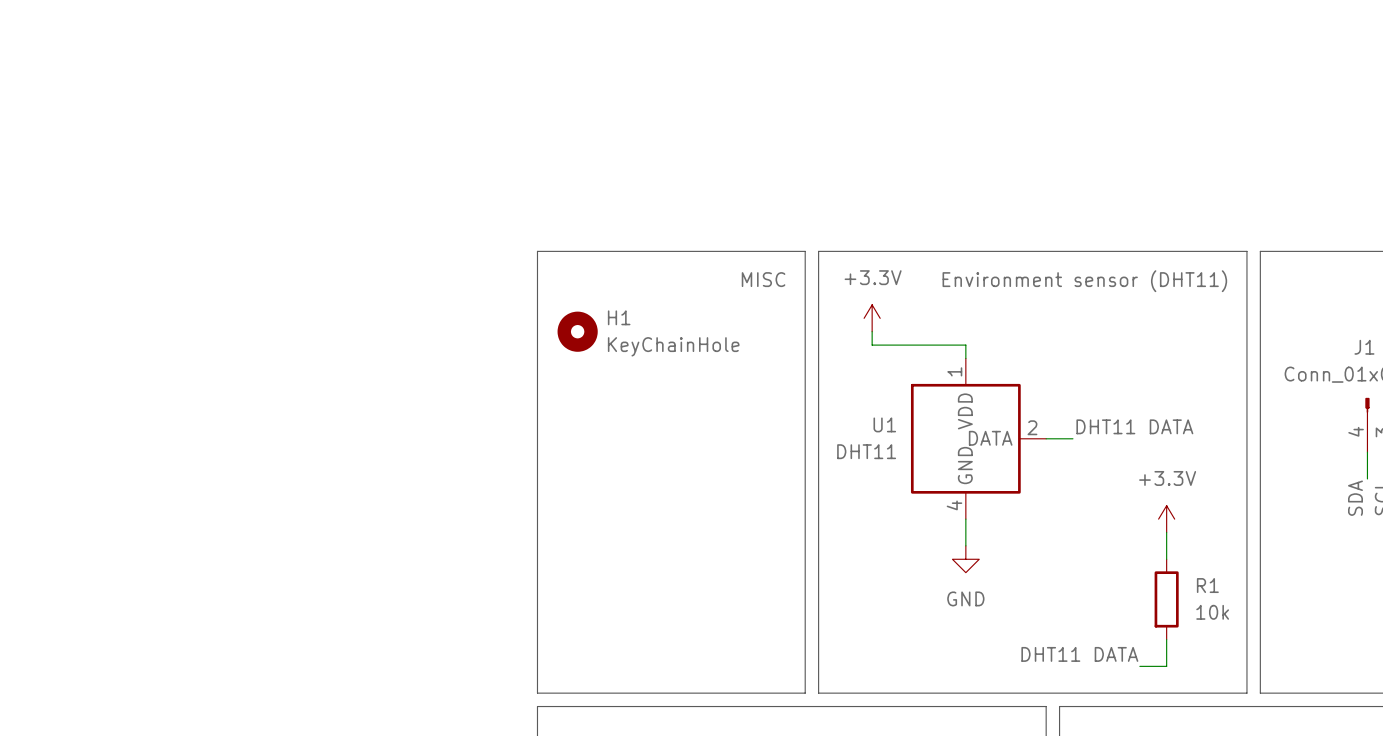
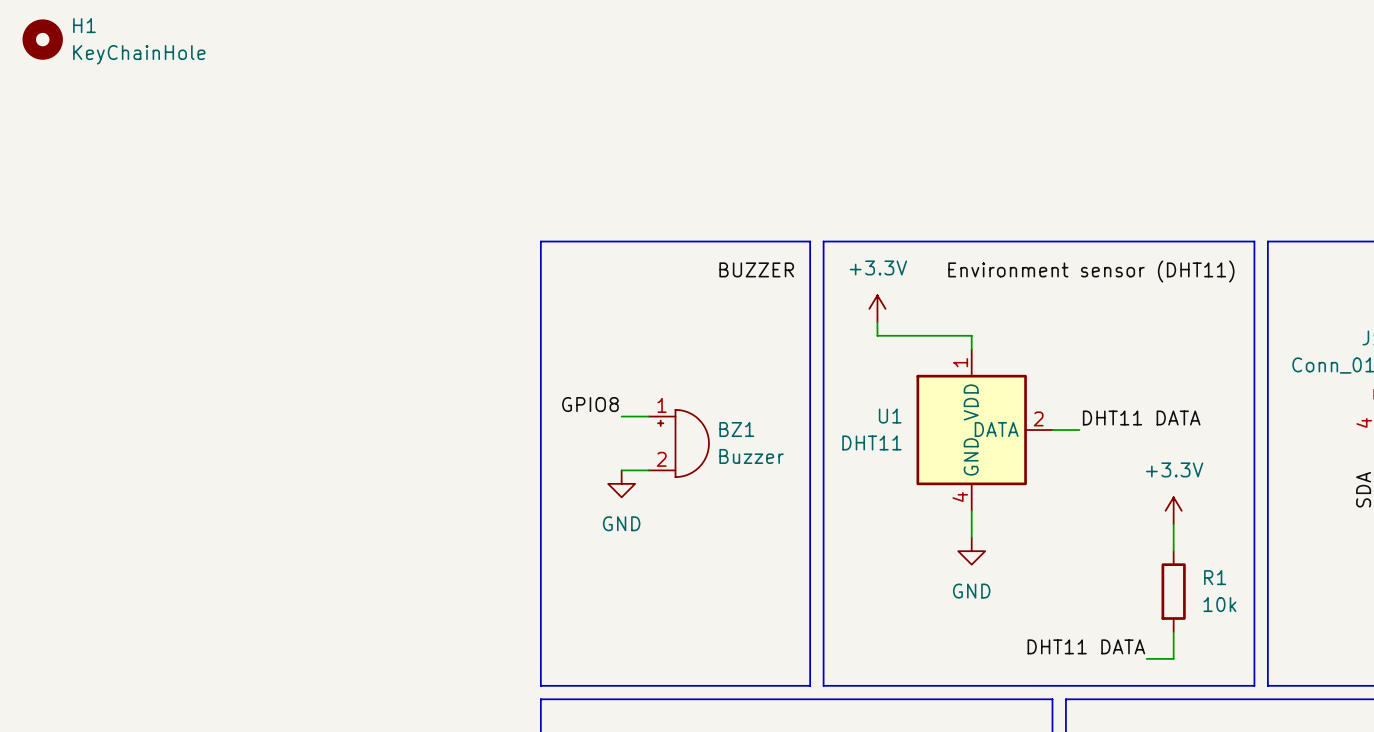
label: none -> BUZZER (756, 269)
label: MISC (763, 279) -> none
H1 position: (577, 331) -> (42, 39)
label: none -> GPIO8 (590, 404)
wire: none -> (621, 416) (648, 416)
BZ1: none -> Buzzer (678, 443)
wire: none -> (621, 470) (648, 470)
power symbol: none -> GND (621, 483)

